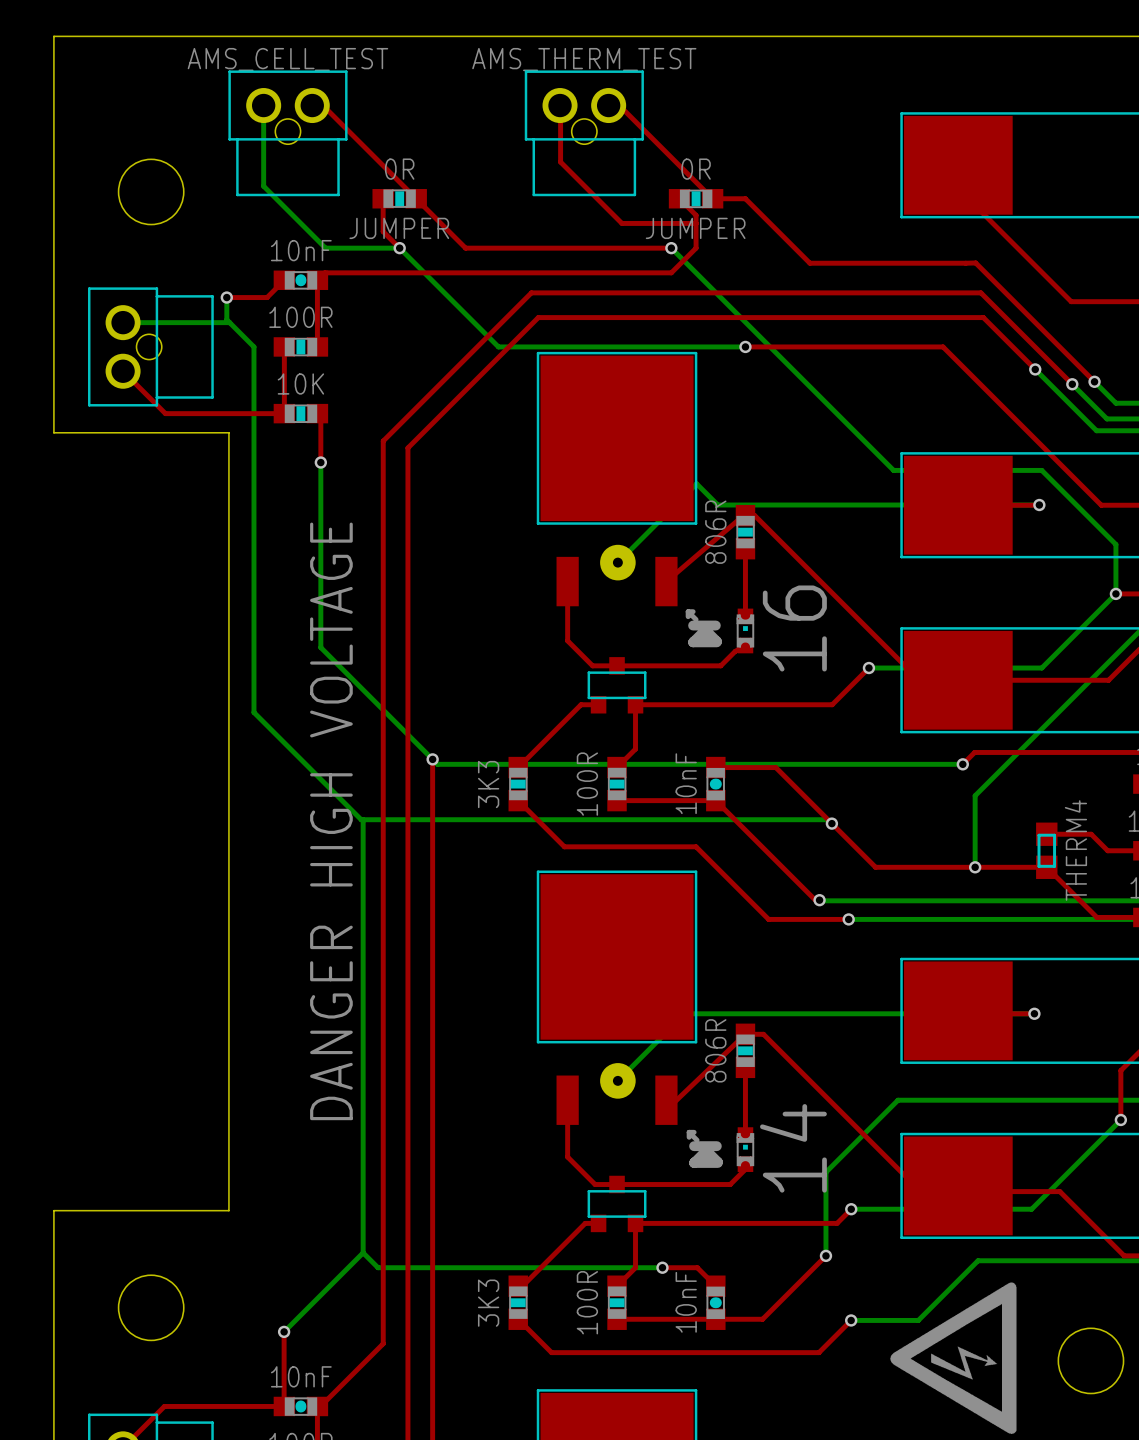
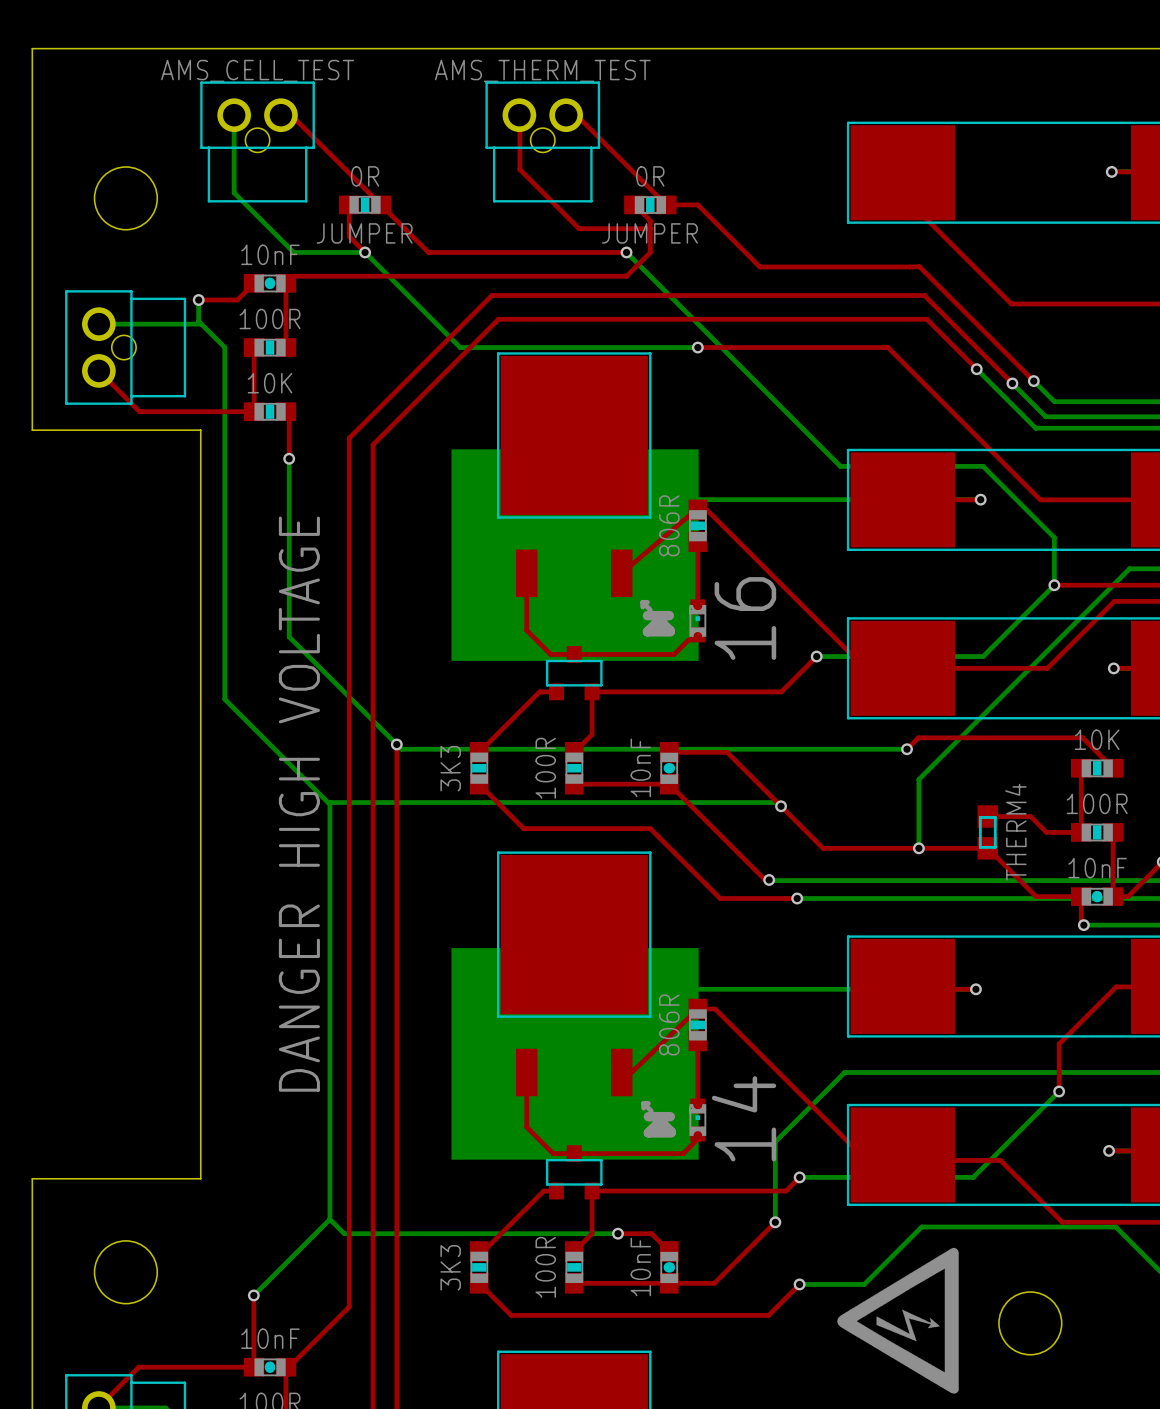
part footprint: [600, 544, 636, 581] -> [451, 449, 699, 661]
part footprint: [600, 1063, 636, 1099] -> [451, 948, 699, 1160]

